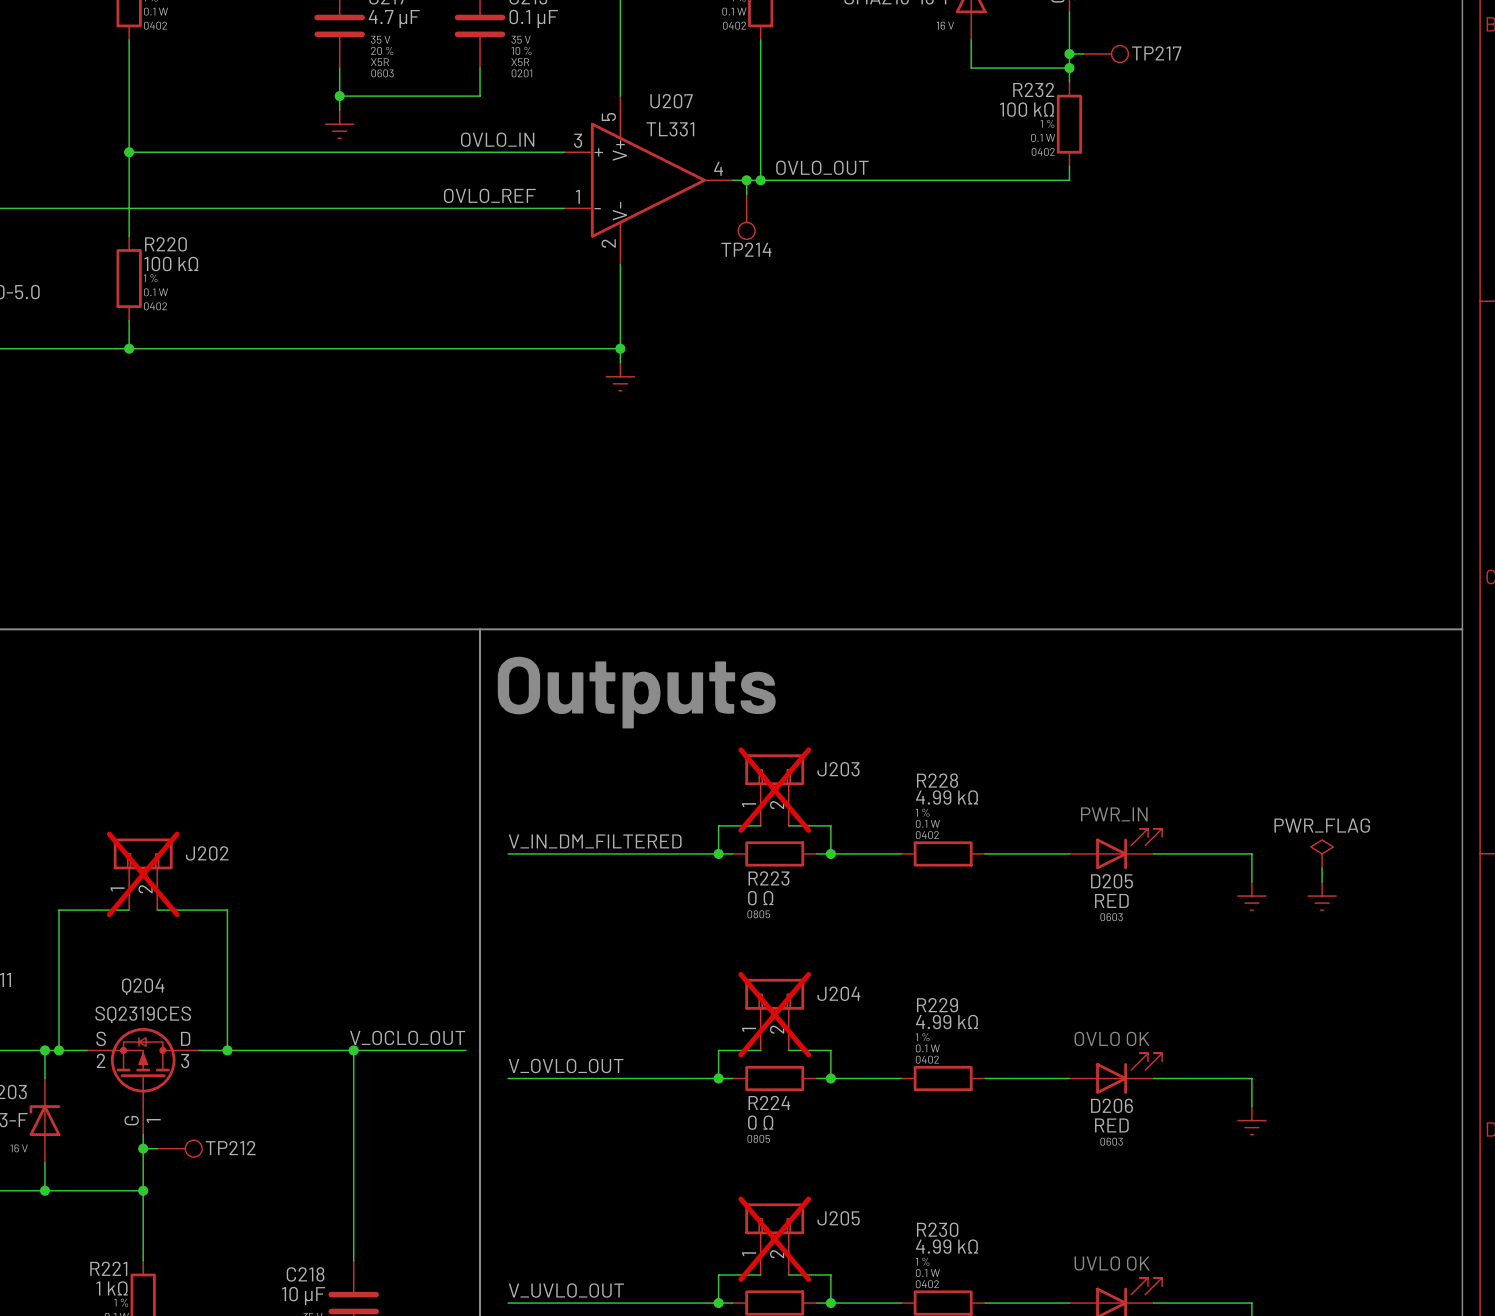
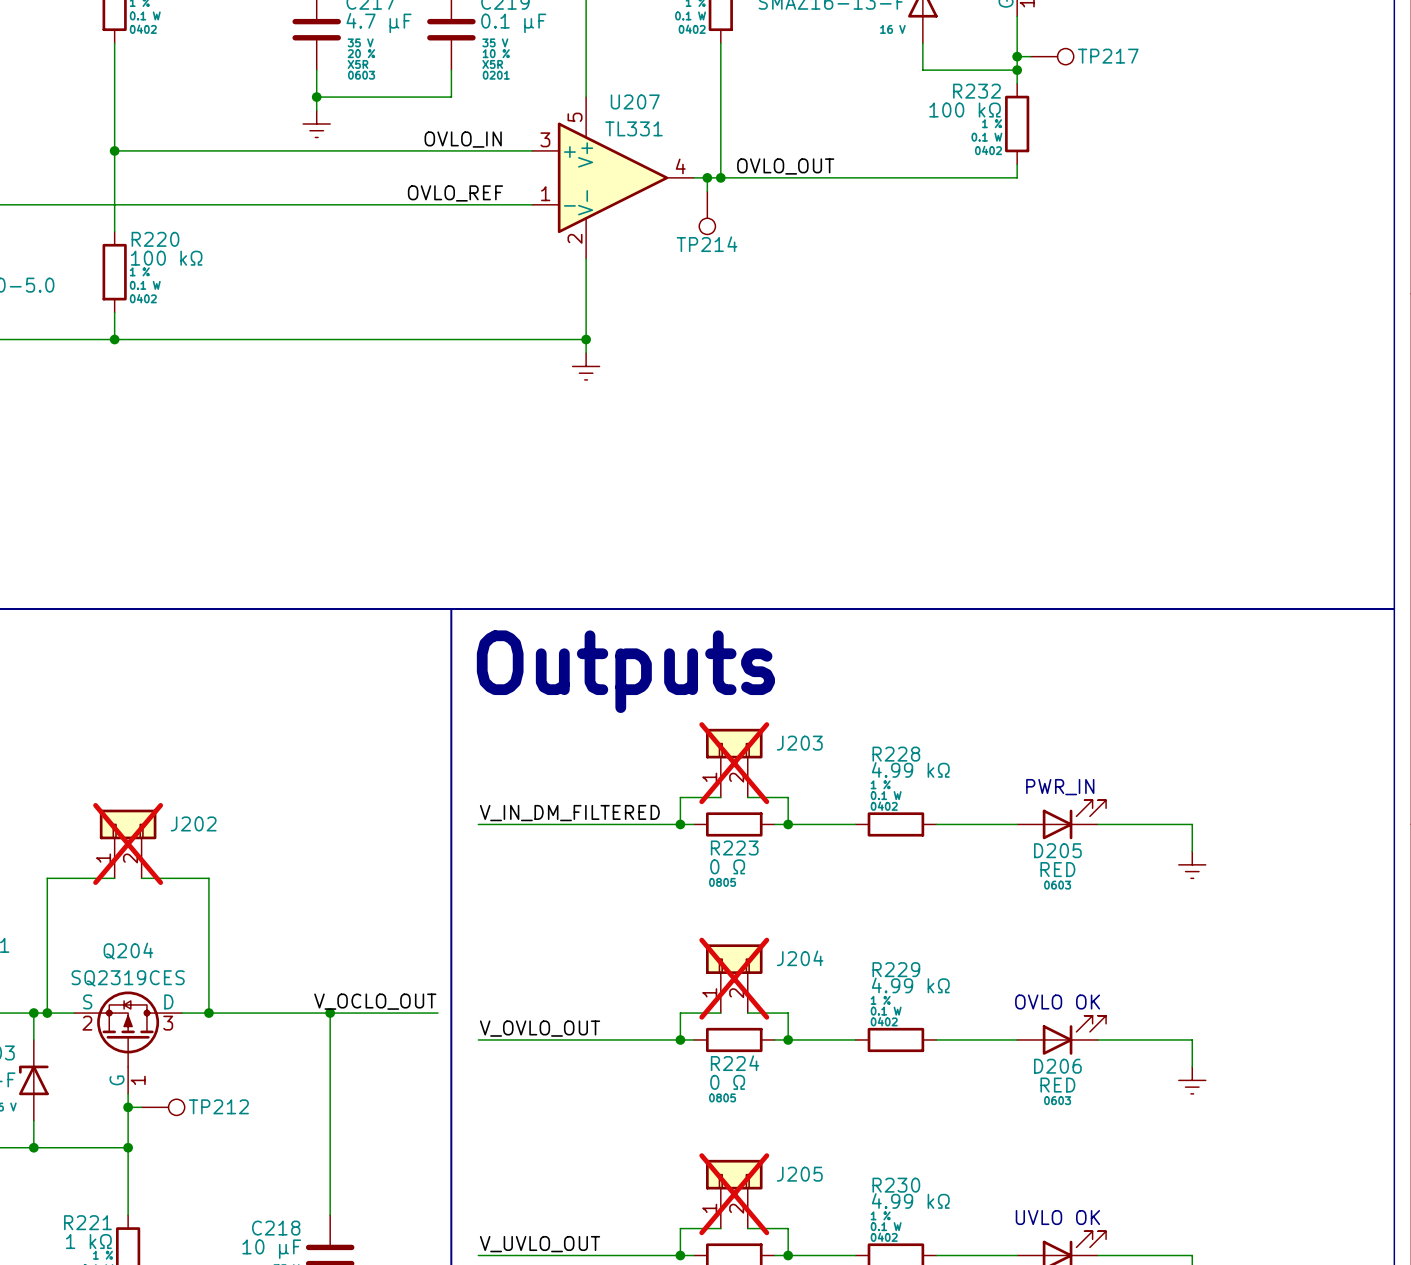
power symbol: PWR_FLAG (1322, 853) -> none
wire: (1322, 867) (1322, 882) -> none
power symbol: (1322, 896) -> none

